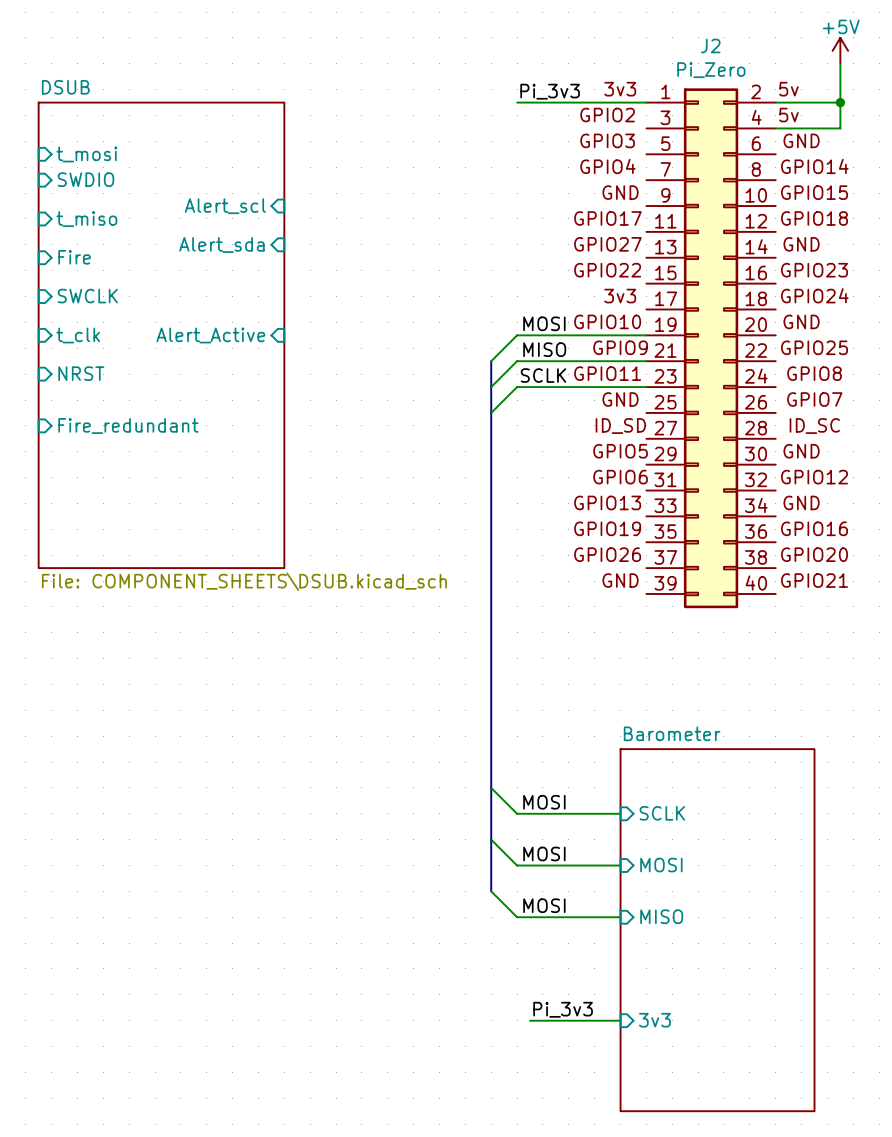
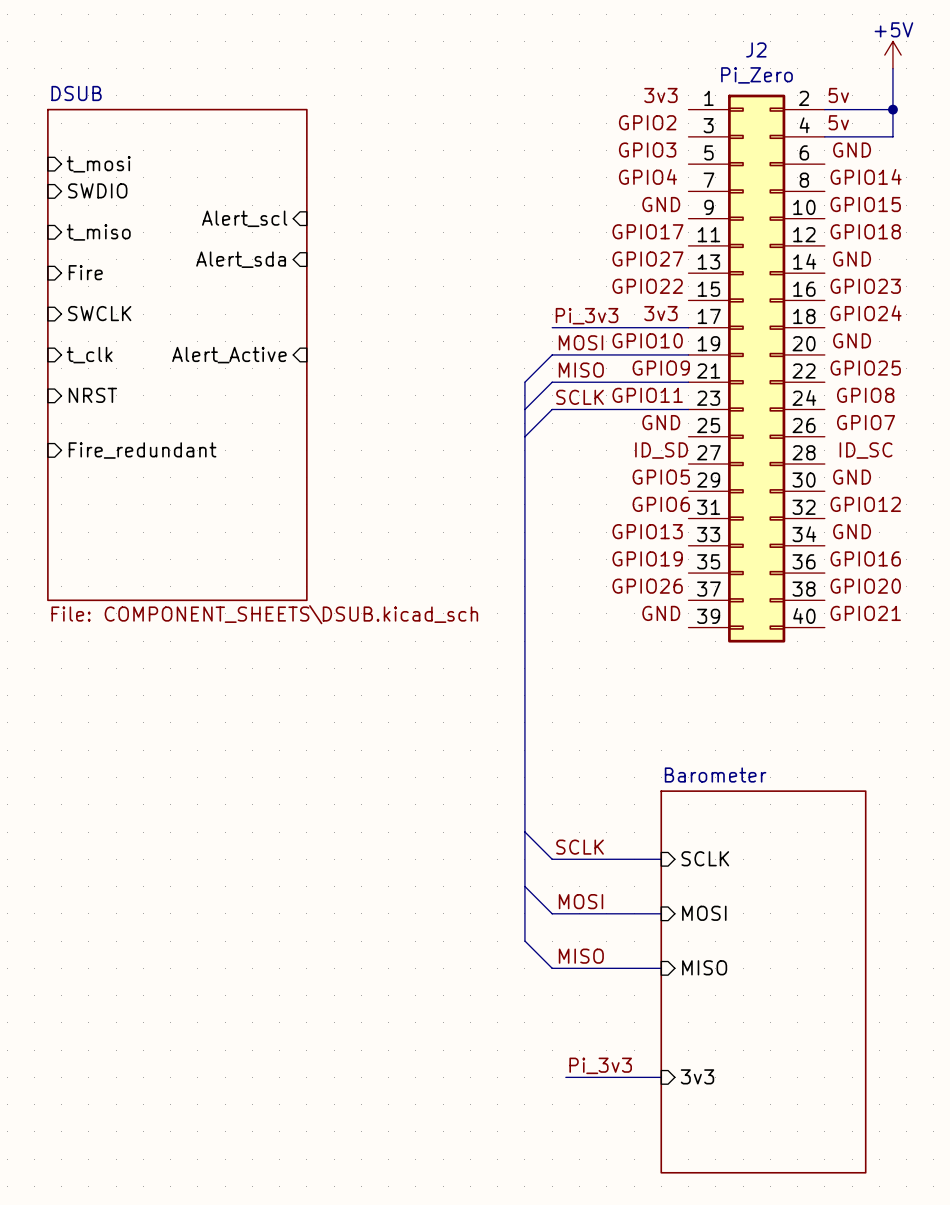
label position: Pi_3v3 (550, 91) -> Pi_3v3 (587, 316)
wire: (517, 102) (646, 102) -> (552, 327) (688, 327)
label: MOSI (544, 802) -> SCLK (580, 847)
label: MOSI (544, 905) -> MISO (581, 956)

